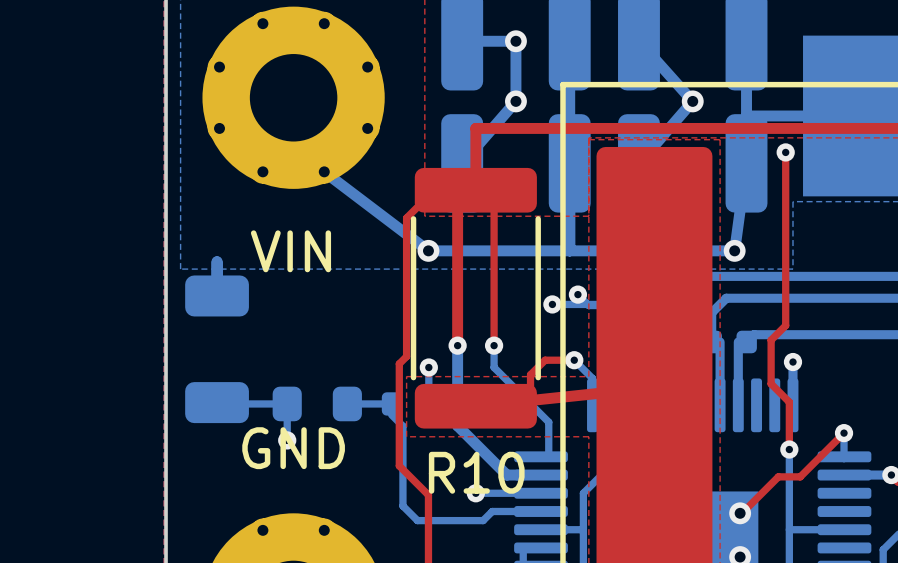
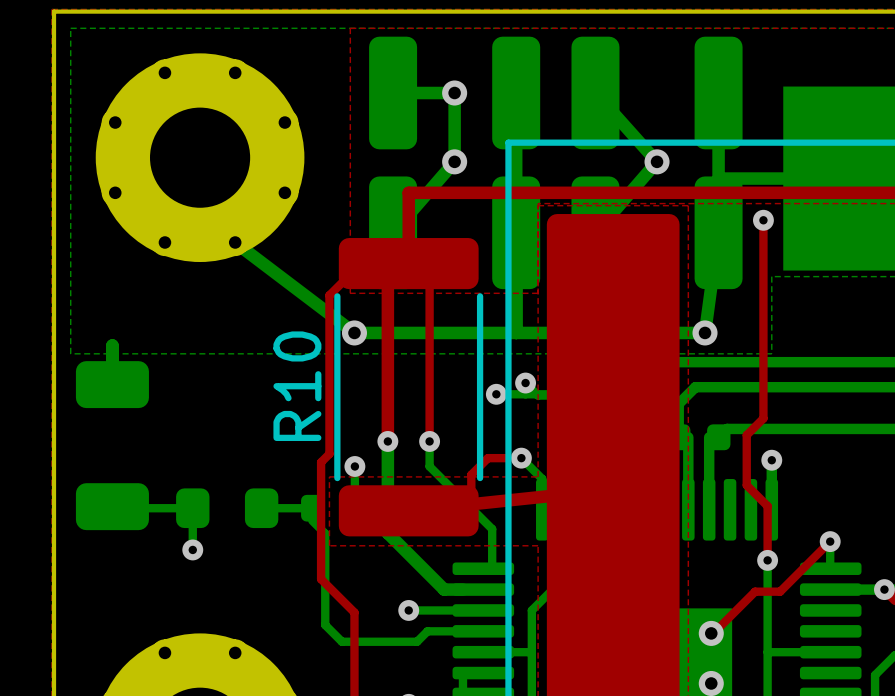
text: VIN (290, 251) -> none
text: GND (293, 448) -> none
R10 name rotation: 0° (476, 472) -> 90° counterclockwise (297, 386)
R10 name position: R10 (476, 472) -> R10 (297, 386)

